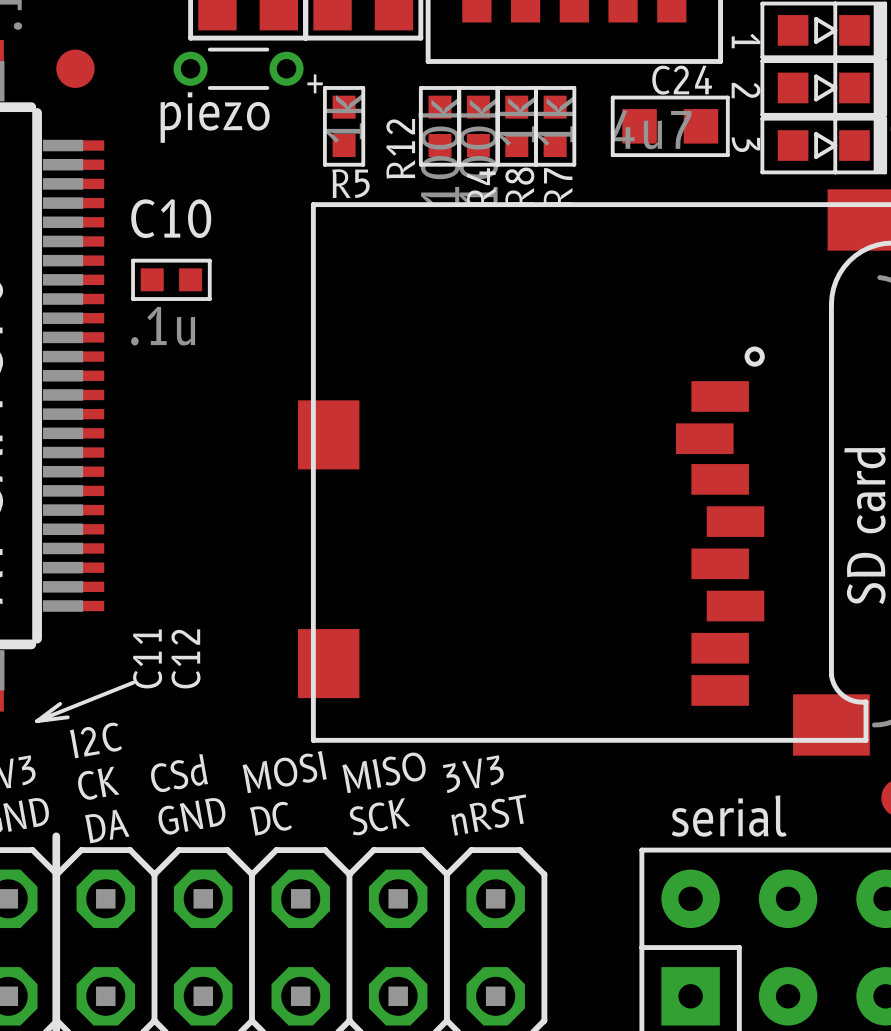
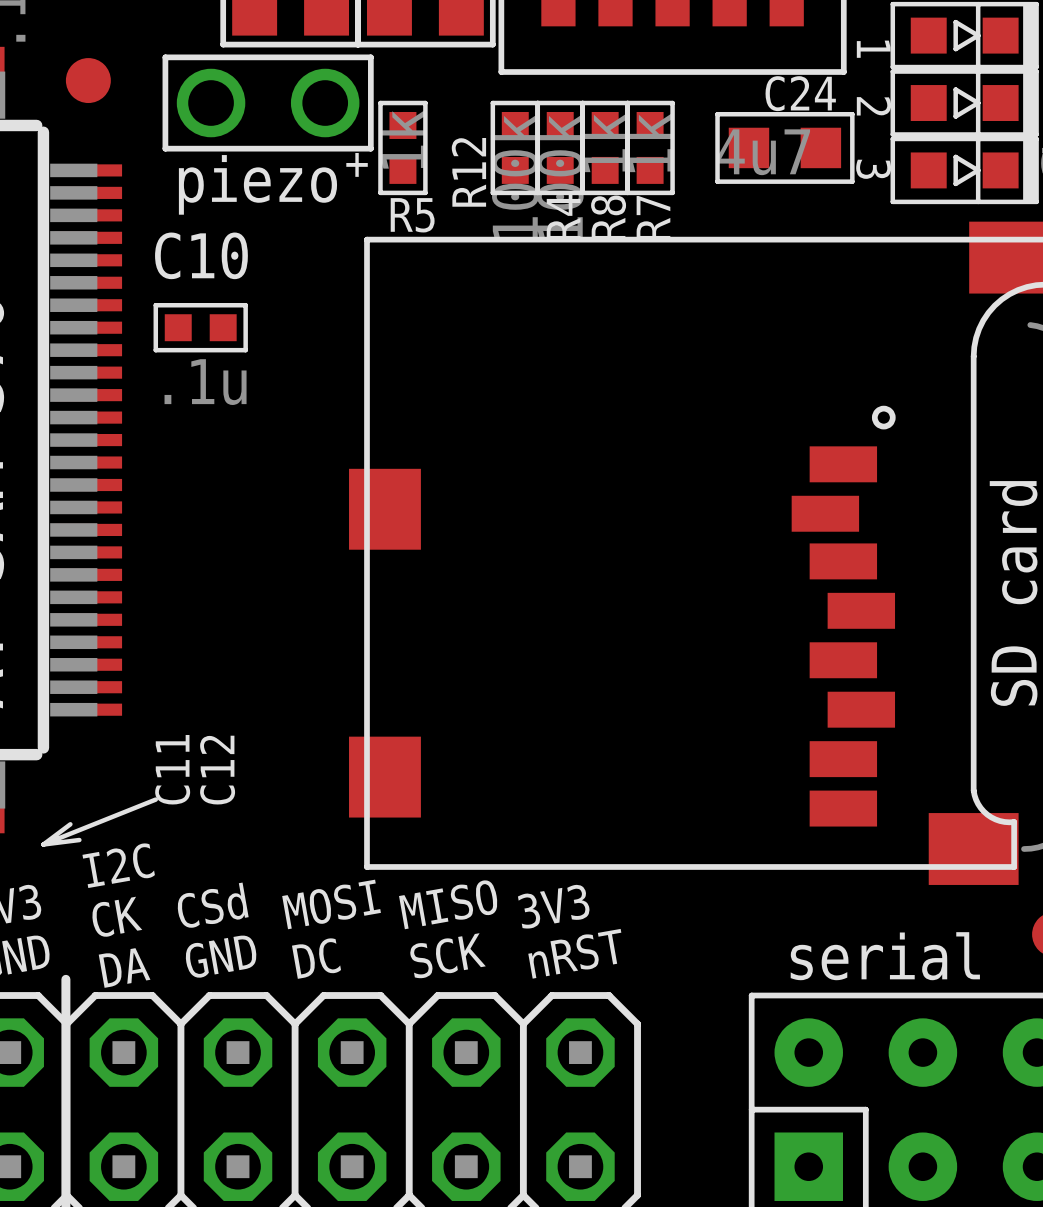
line: (209, 49) (267, 49) -> none
part: (190, 68) -> none
part: (286, 68) -> none
text position: + (315, 83) -> + (357, 164)
line: (209, 87) (267, 87) -> none
part: none -> (268, 103)
text position: piezo (215, 117) -> piezo (257, 184)

